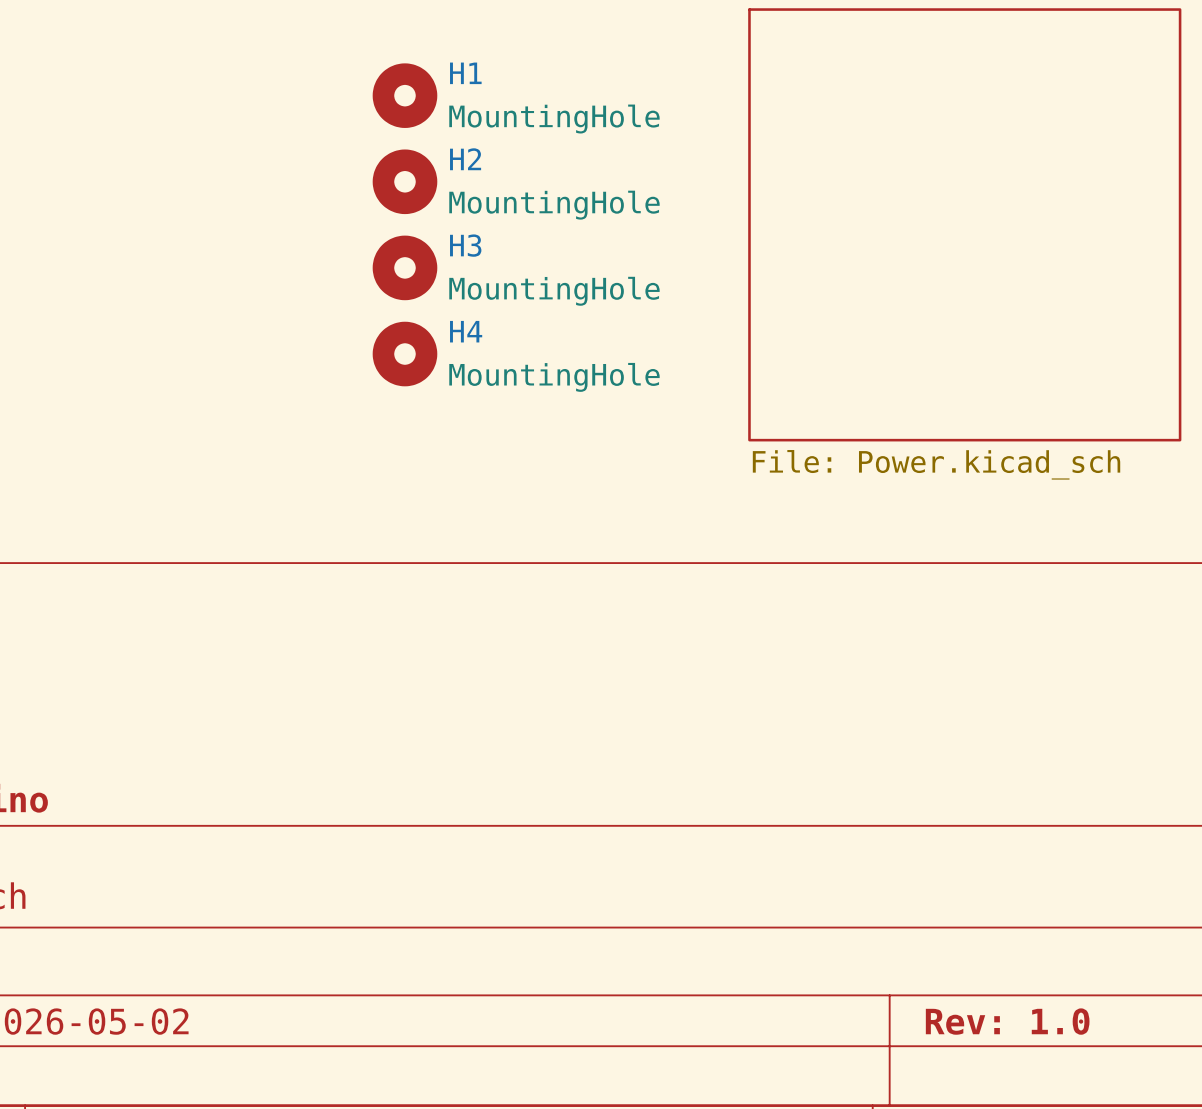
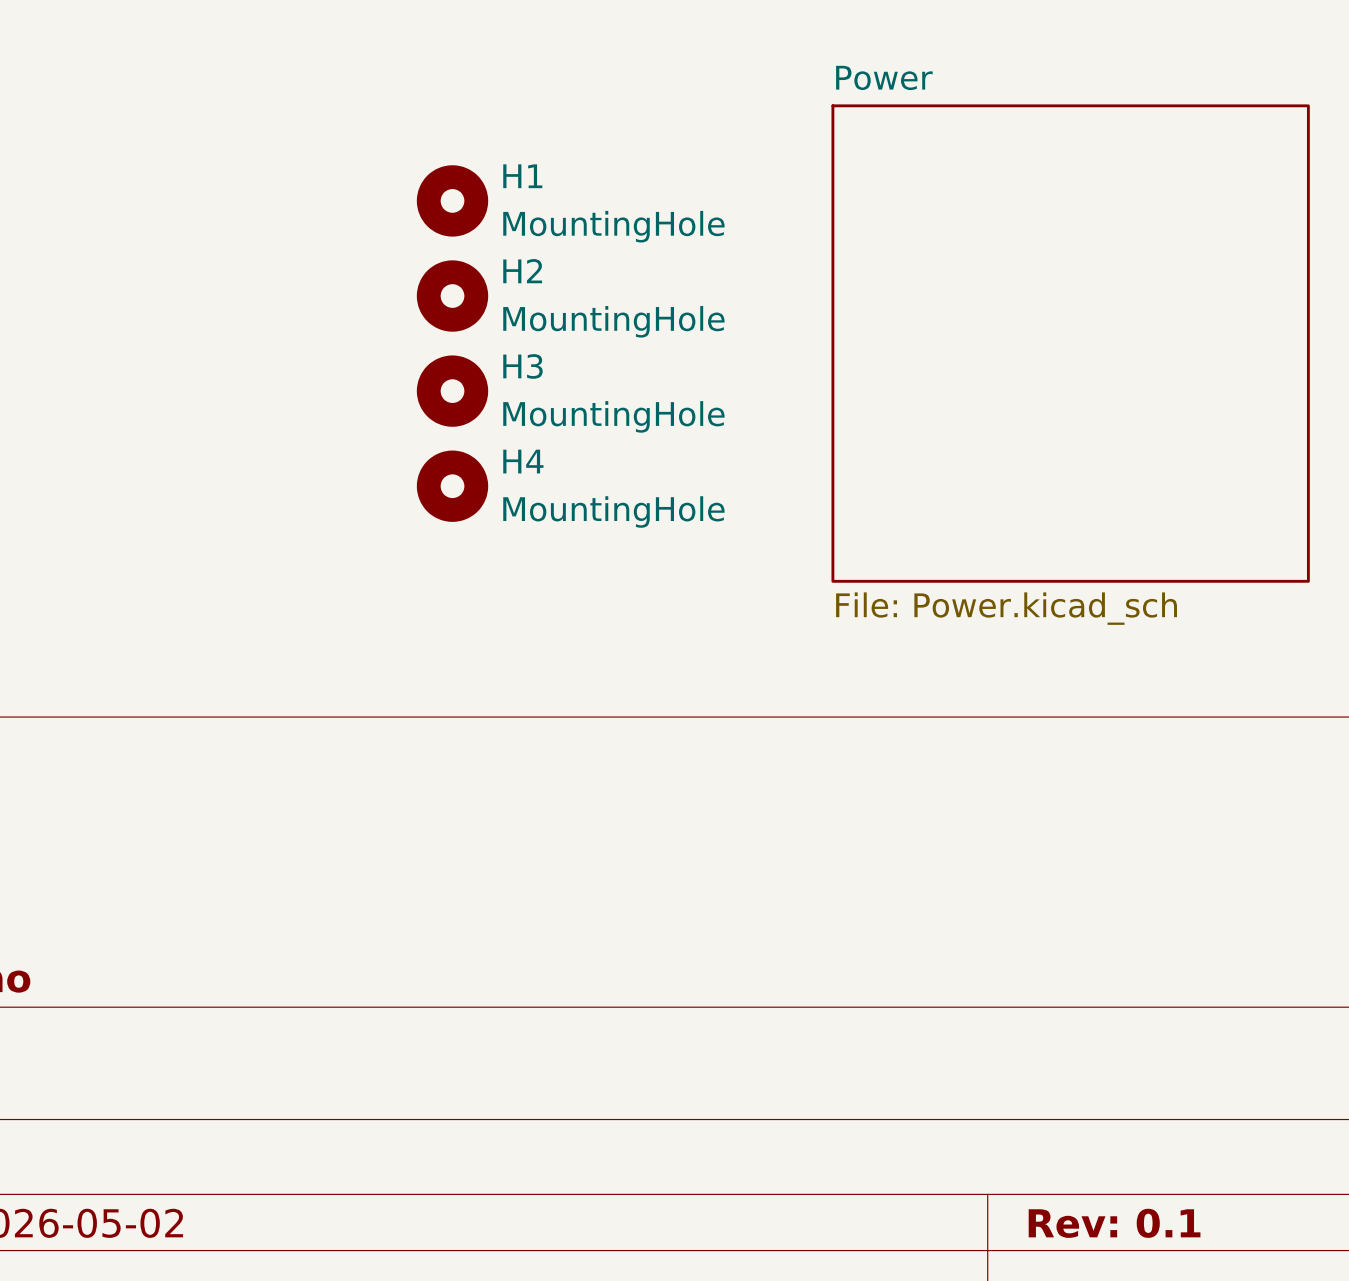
title block: Rev: 1.0 (1007, 1021) -> Rev: 0.1 (1114, 1223)

